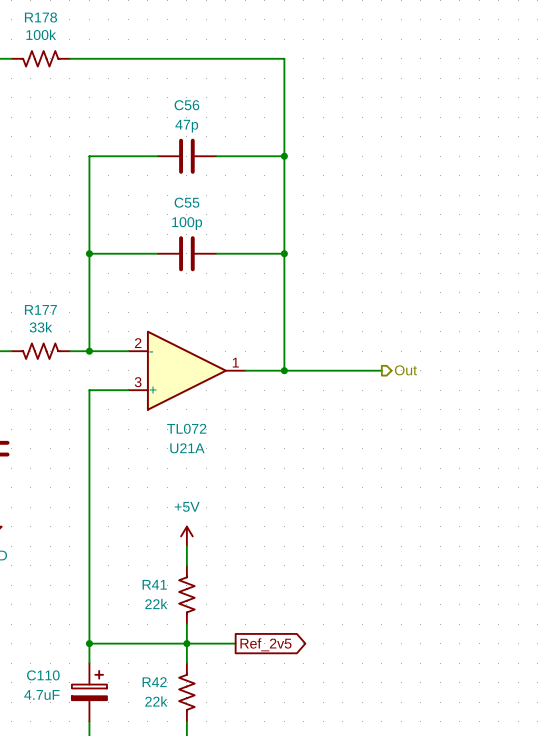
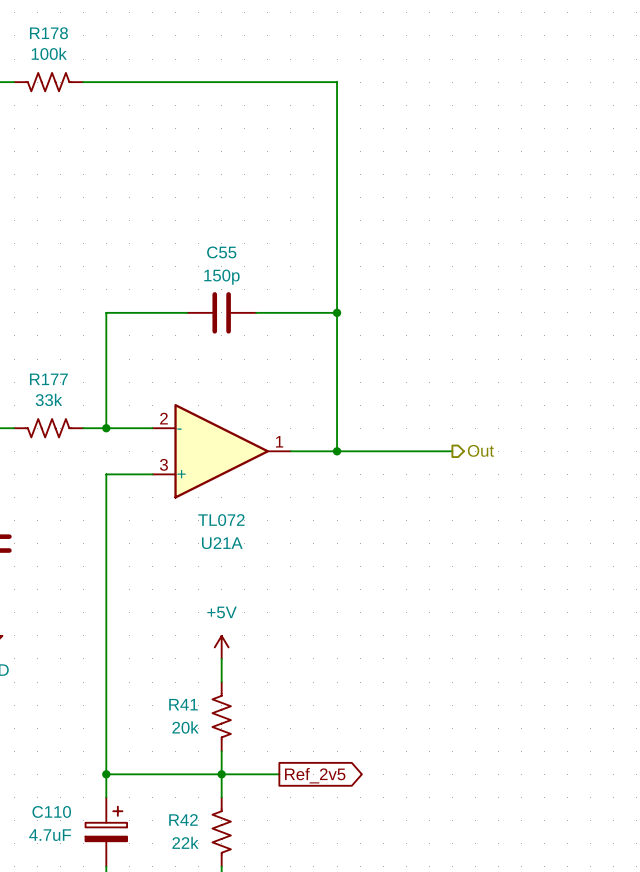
wire: (157, 156) (89, 156) (89, 253) -> none
C56: 47p (186, 156) -> none
wire: (216, 156) (284, 156) -> none
junction: (284, 156) -> none
C55 value: 100p (187, 223) -> 150p (221, 277)
junction: (89, 253) -> none
R41 value: 22k (156, 604) -> 20k (185, 727)

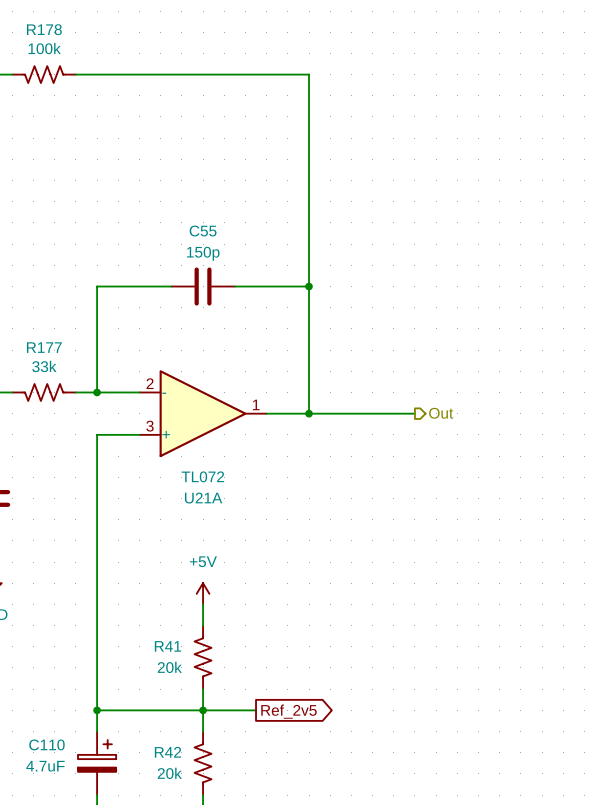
R42 value: 22k (185, 842) -> 20k (169, 773)

